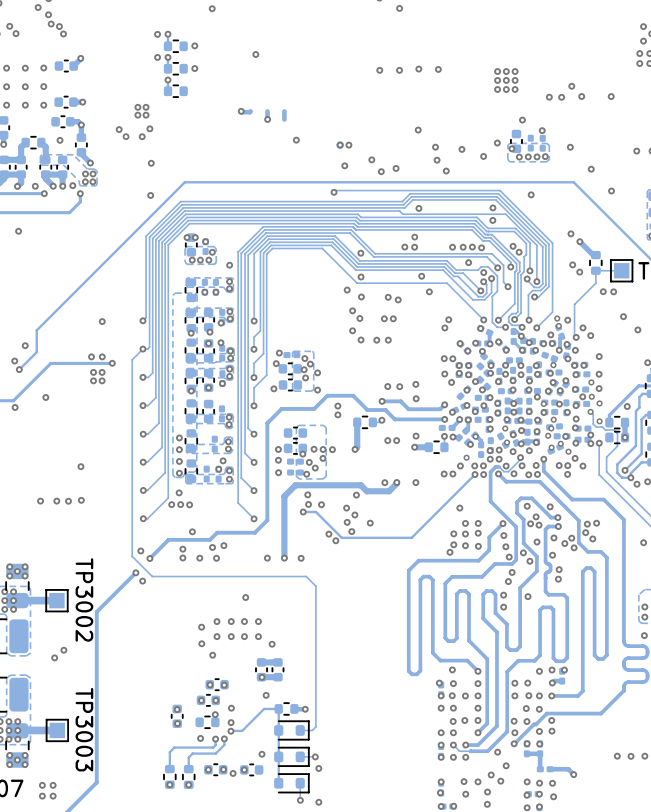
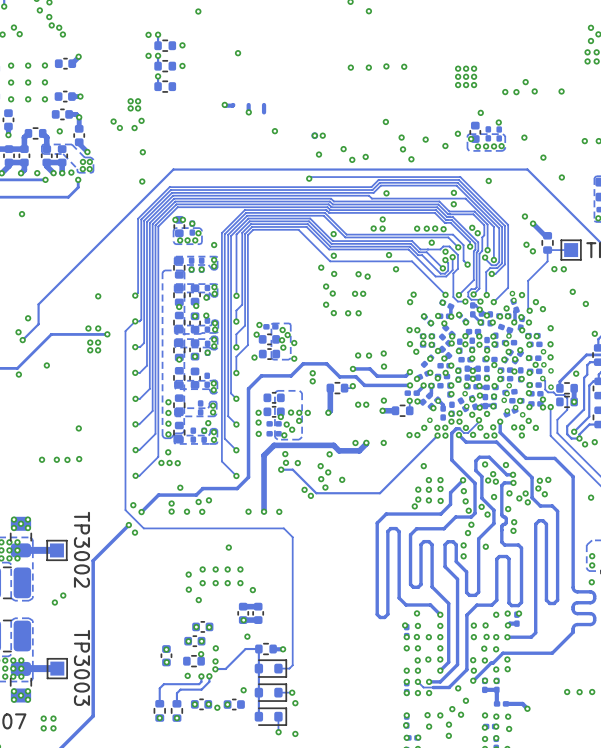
part: none -> (534, 385)

